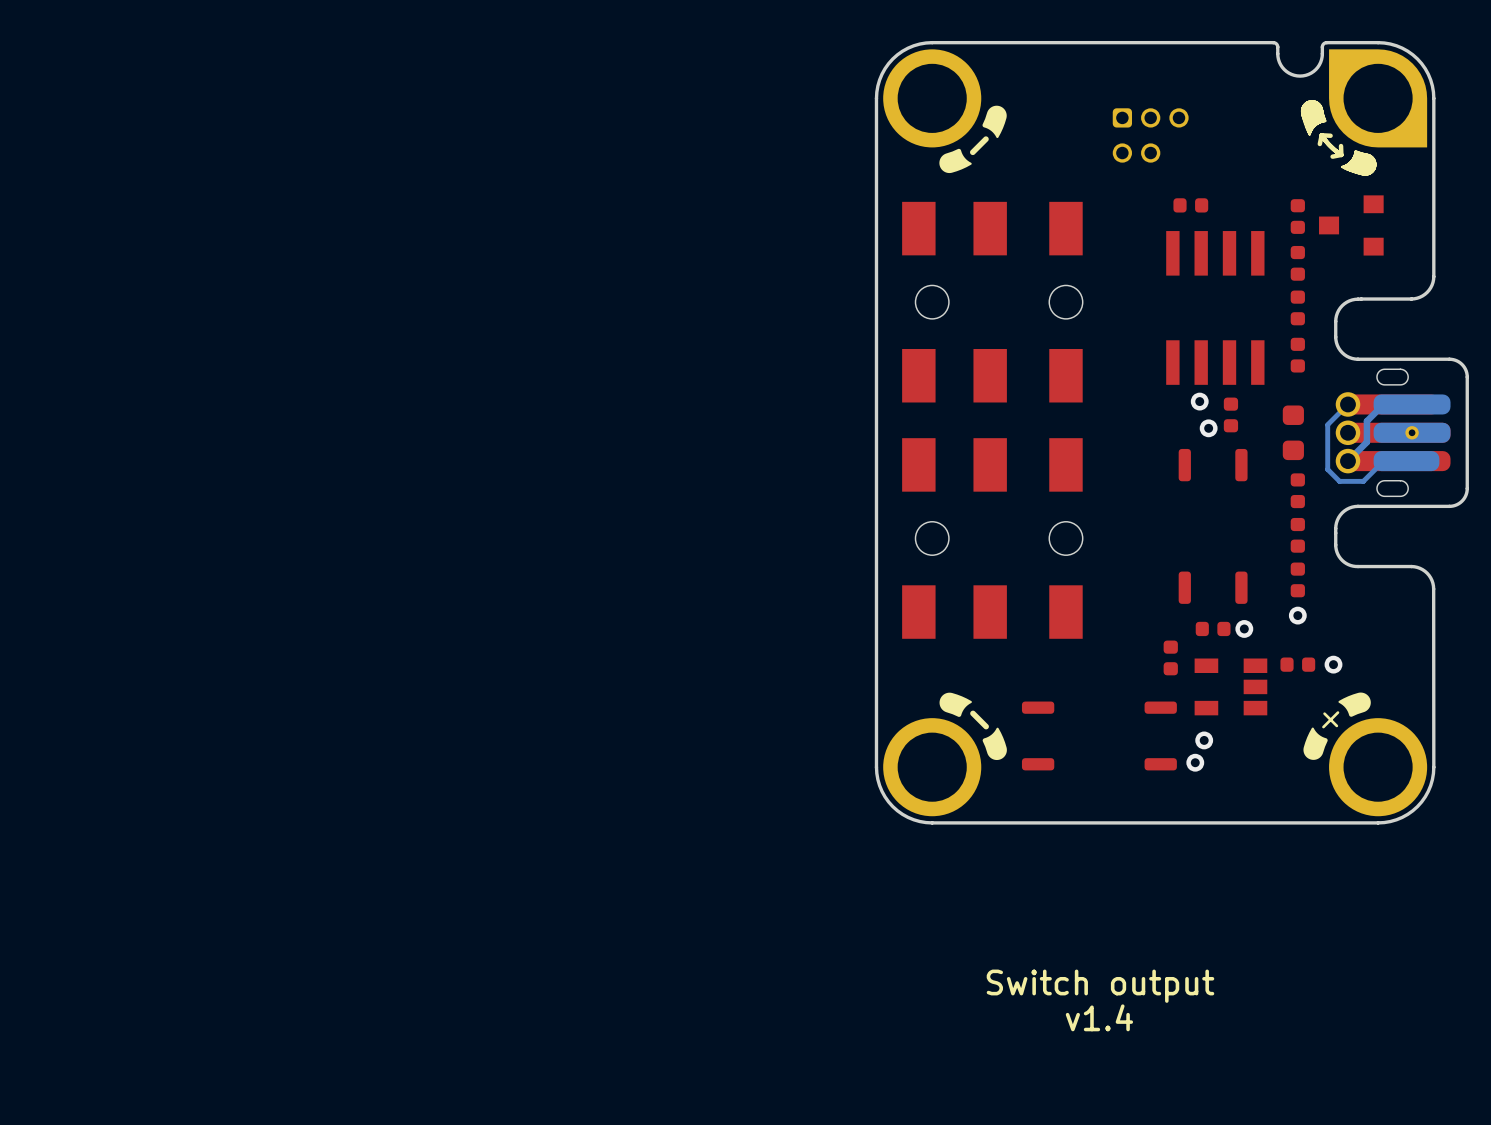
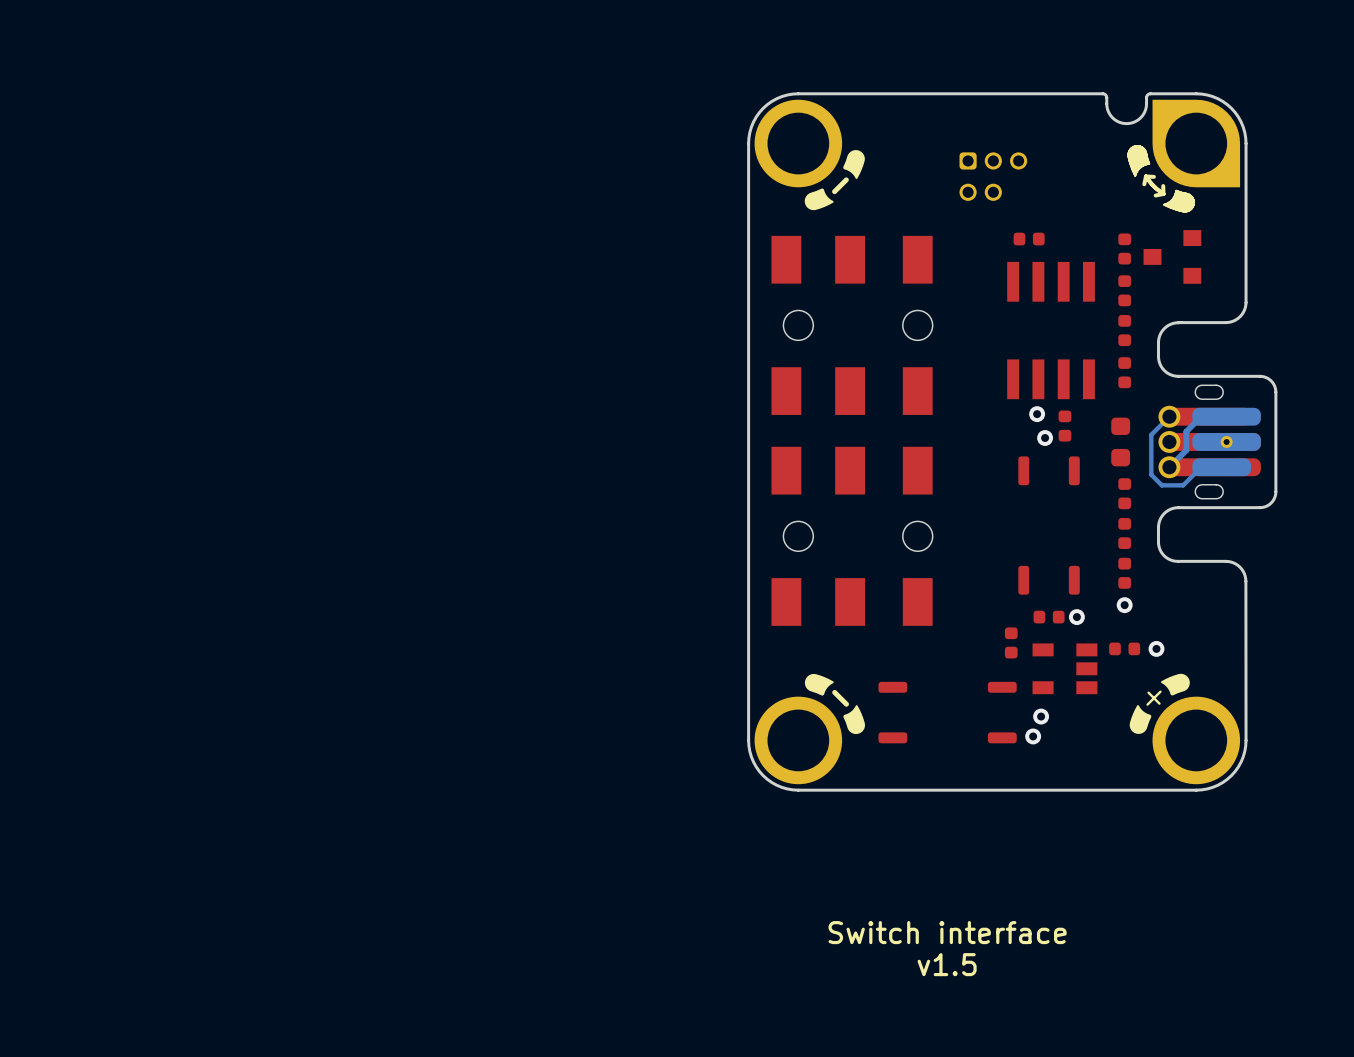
text: Switch output (1100, 986) -> Switch interface (947, 932)
text: v1.4 (1099, 1017) -> v1.5 (947, 964)

